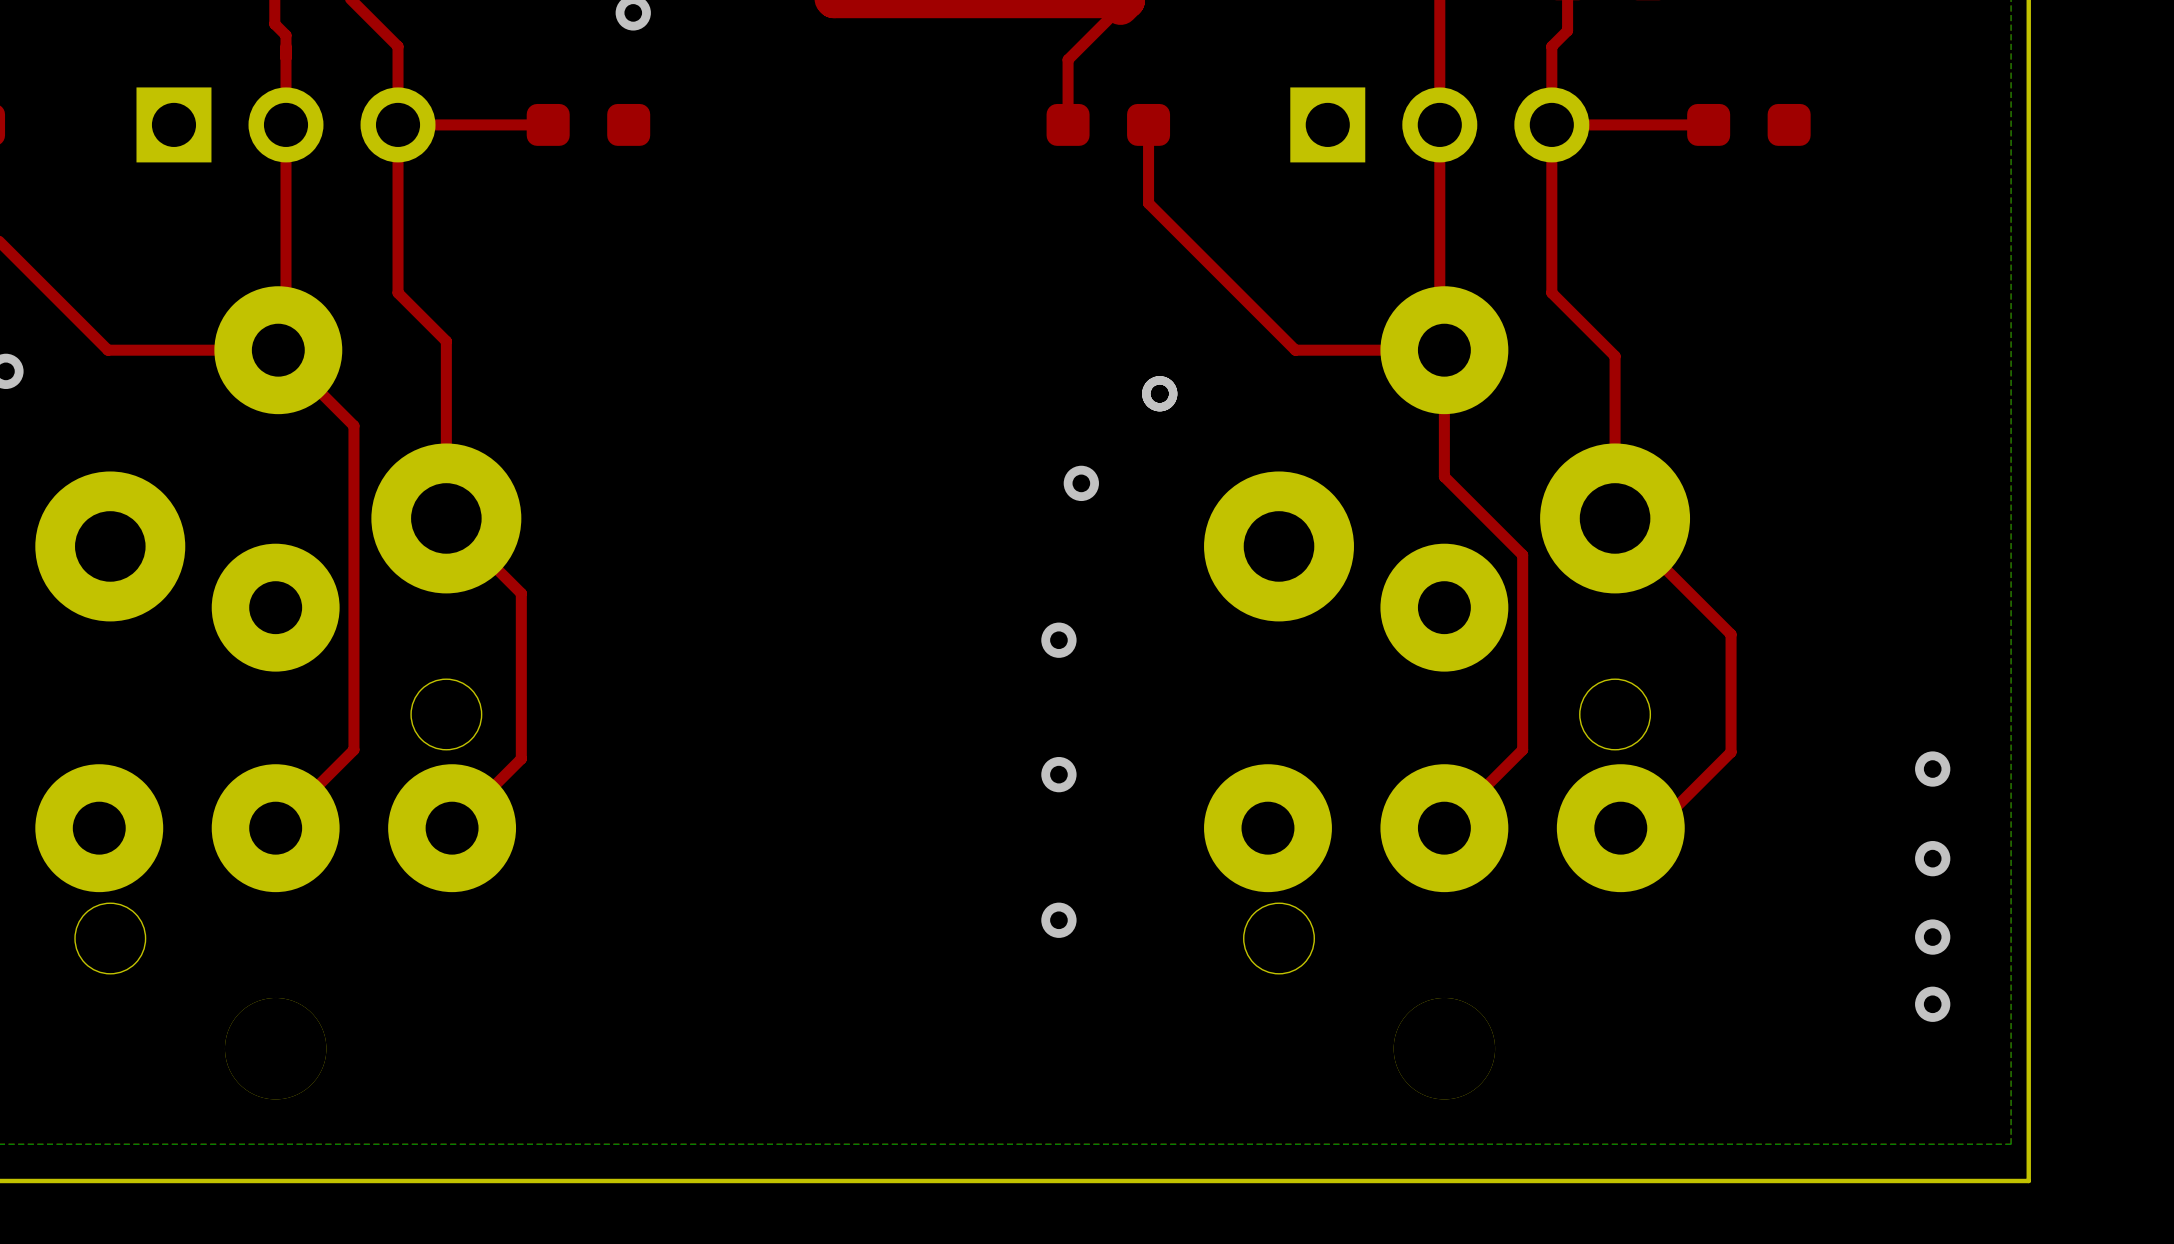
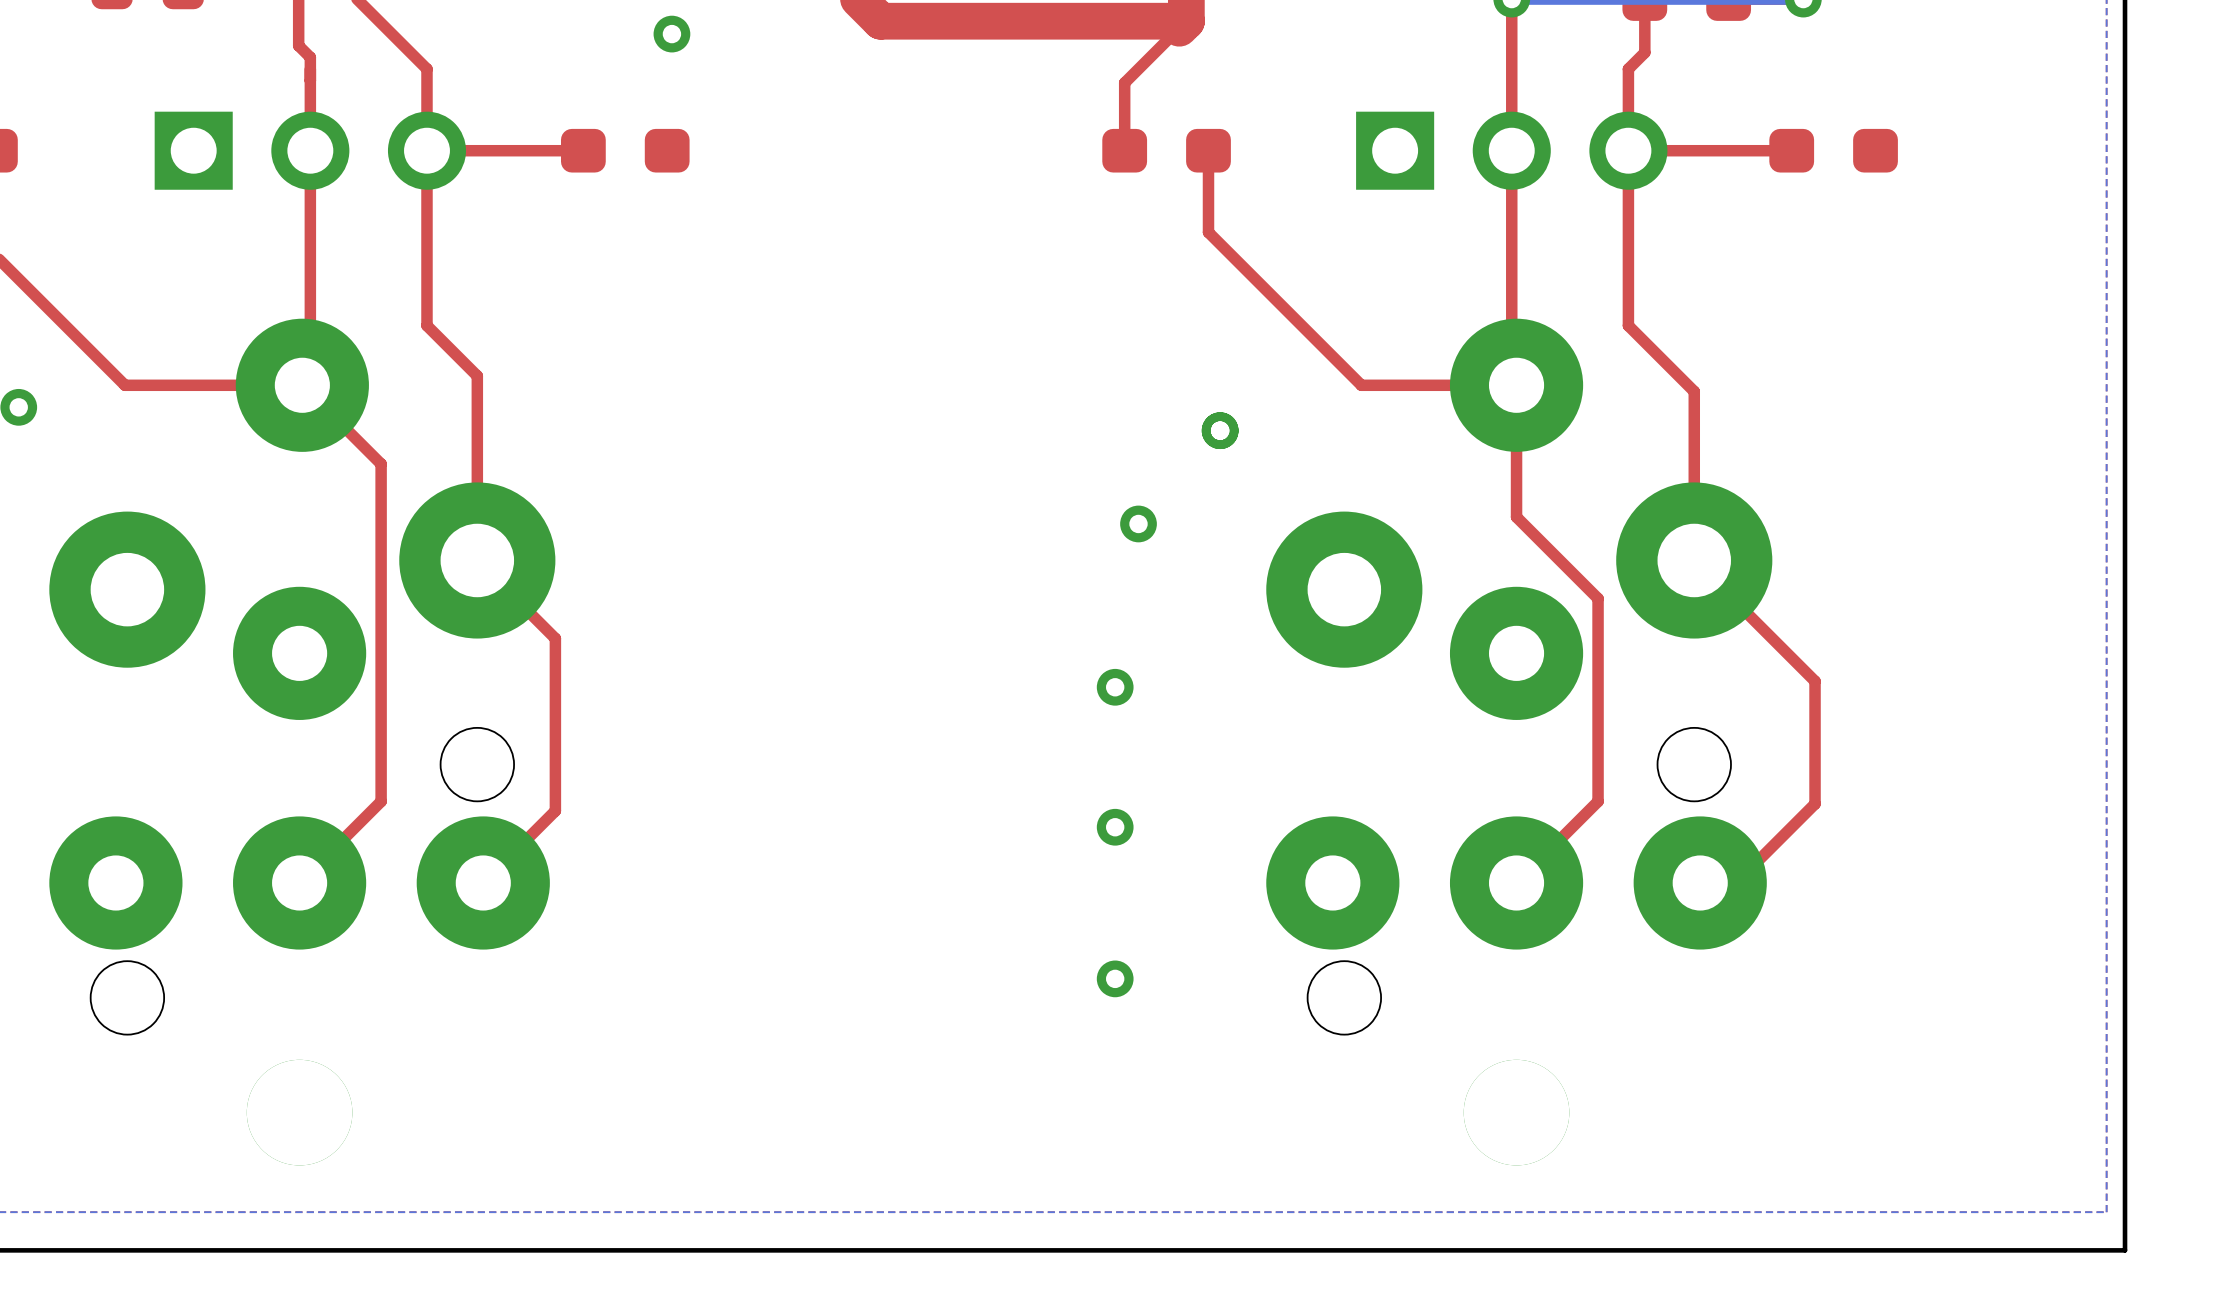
via: (1932, 769) -> none
via: (1932, 858) -> none
via: (1932, 937) -> none
via: (1932, 1004) -> none

